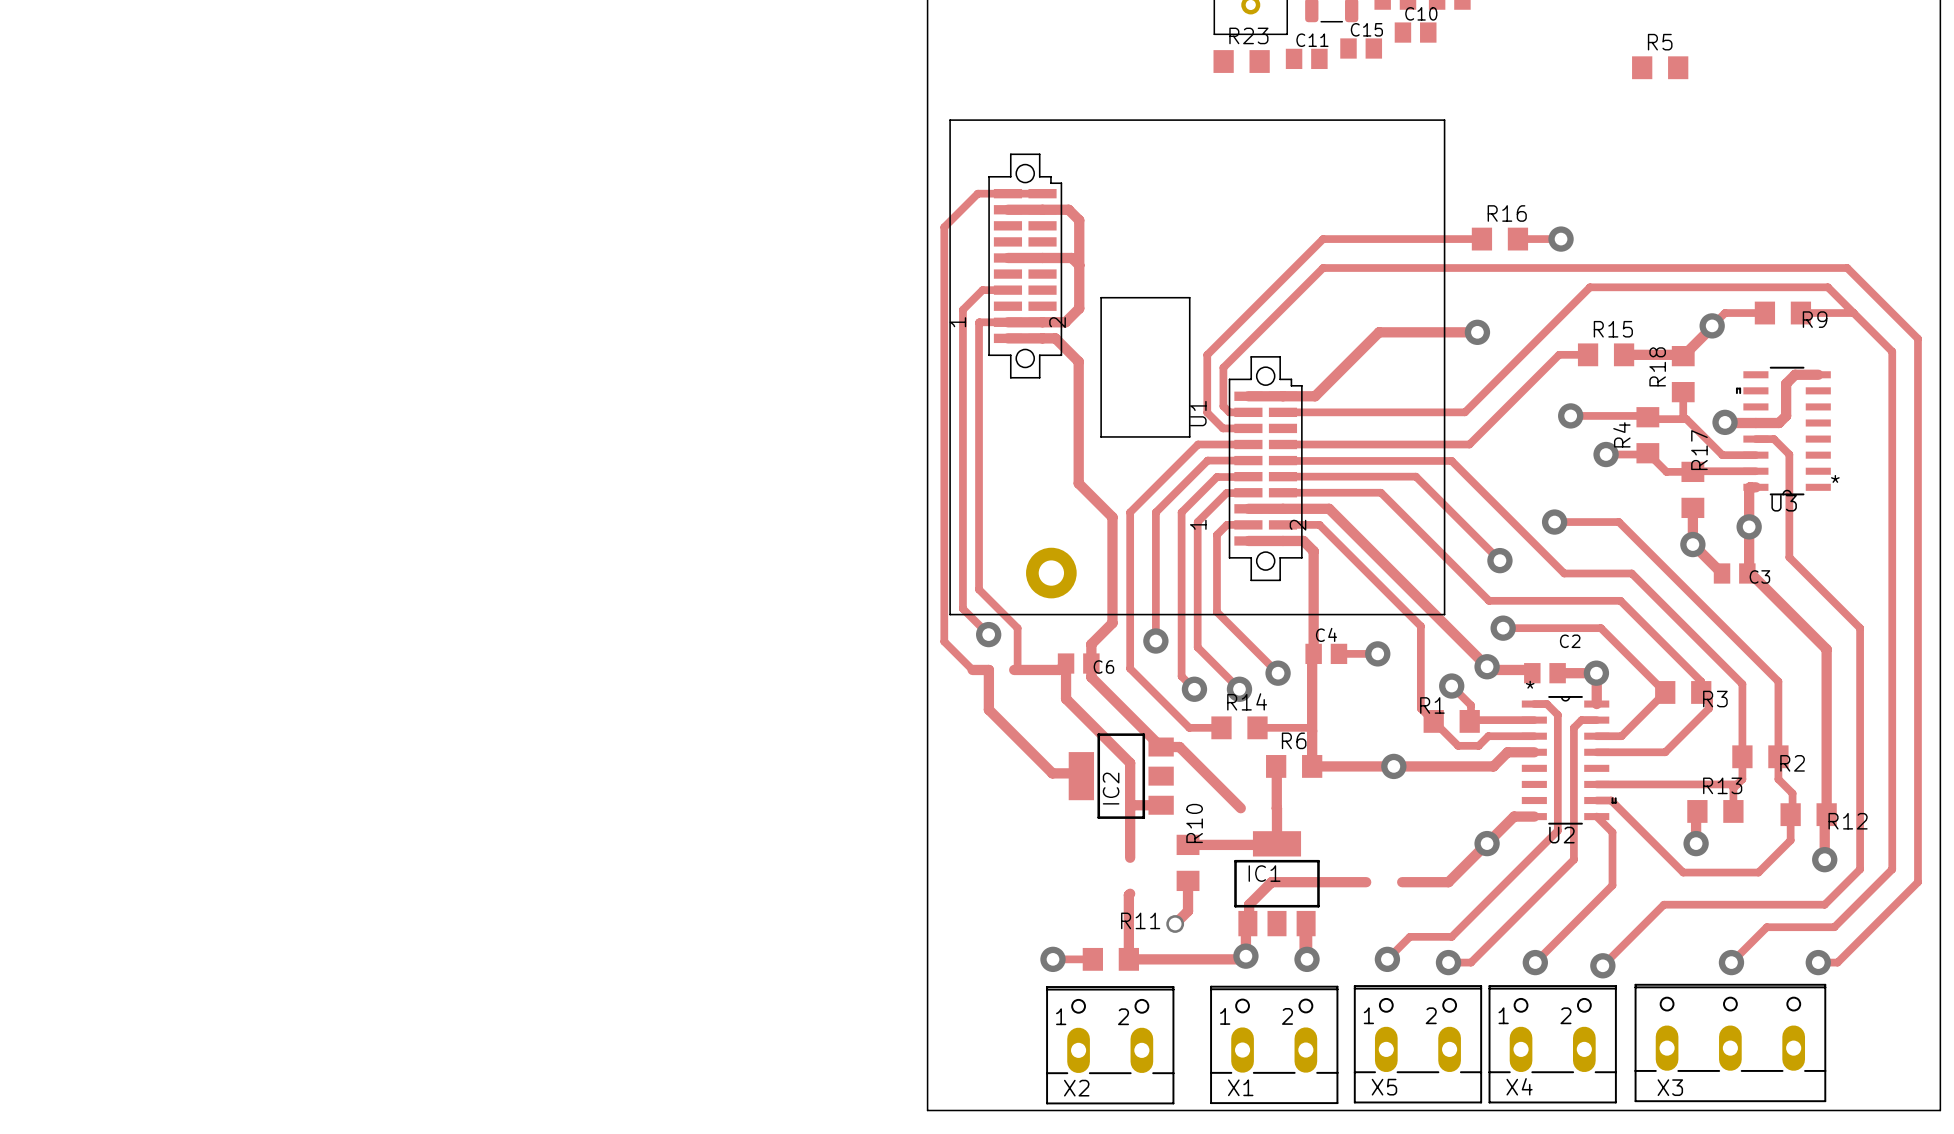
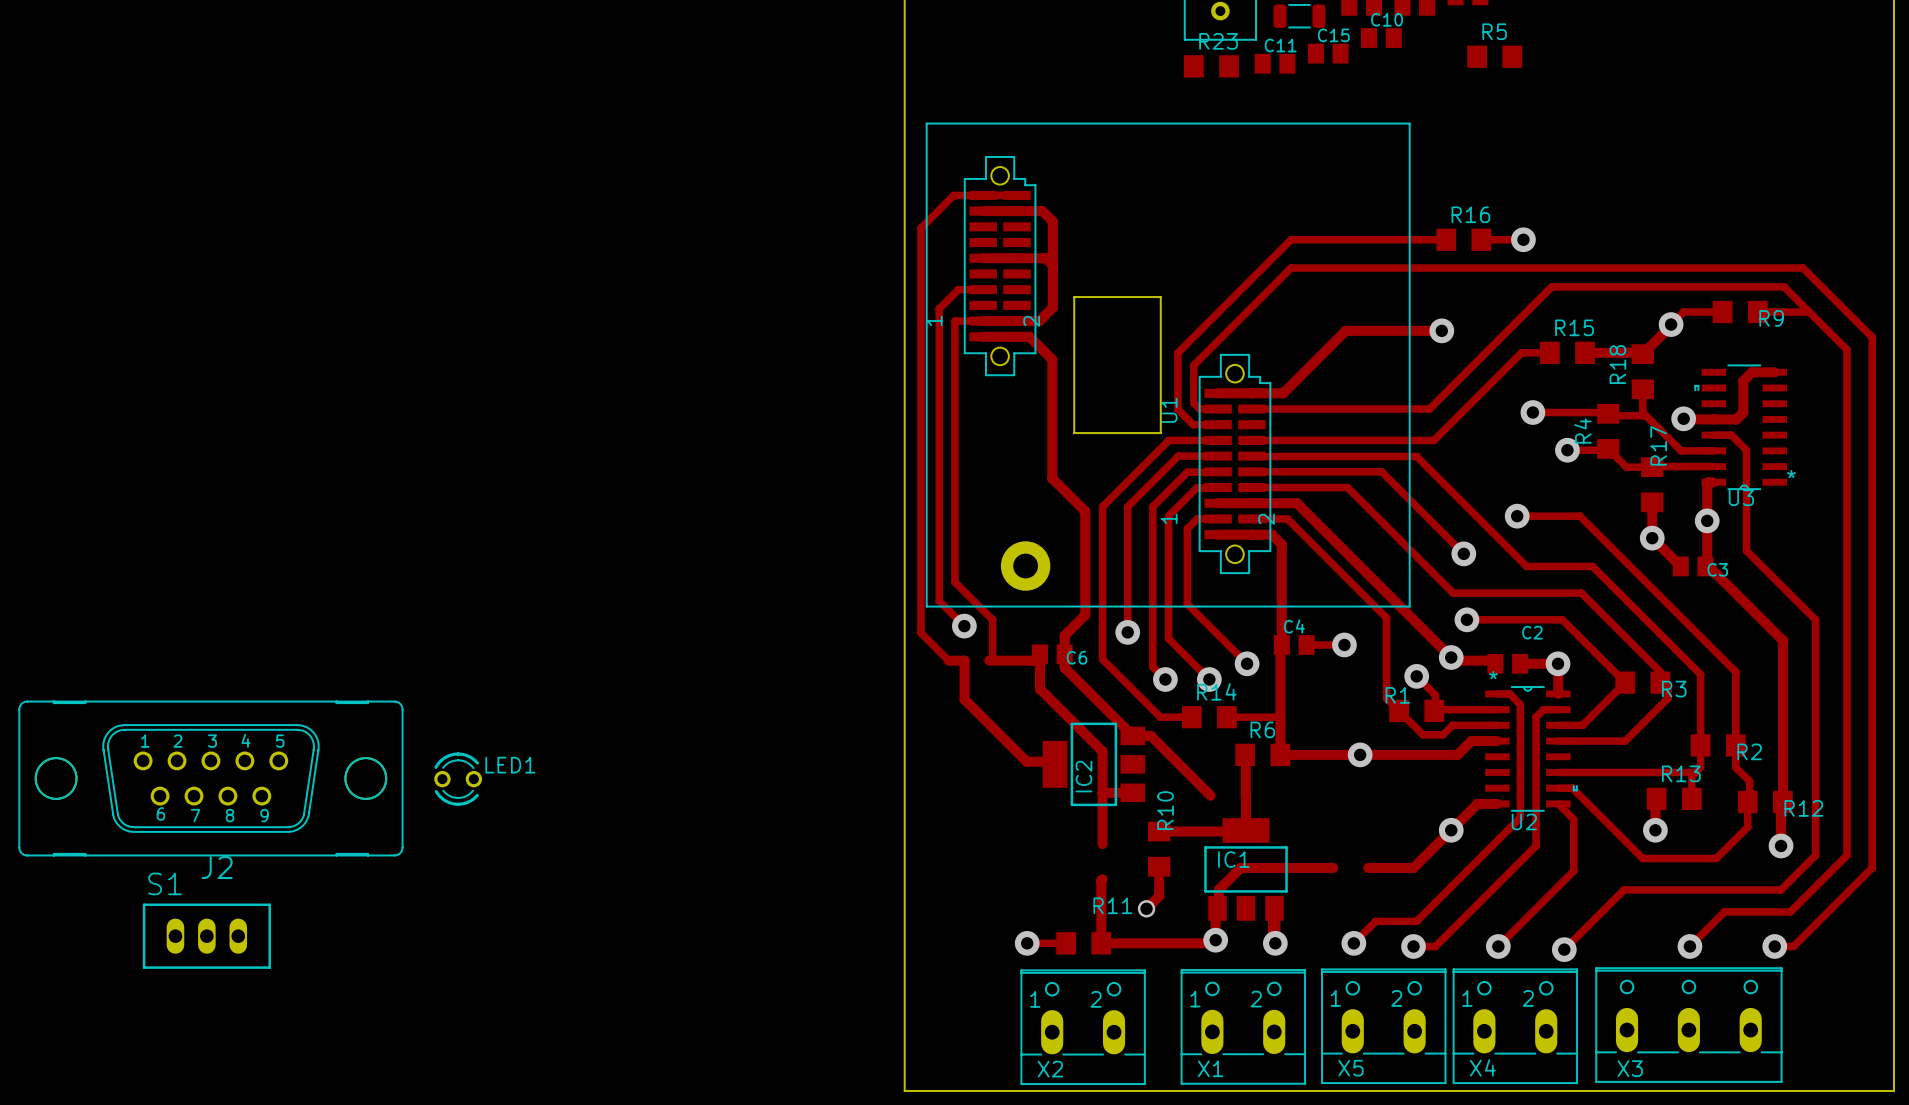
R5 position: (1660, 67) -> (1494, 56)
J2: none -> (210, 778)
LED1: none -> (458, 779)
S1: none -> (206, 936)

